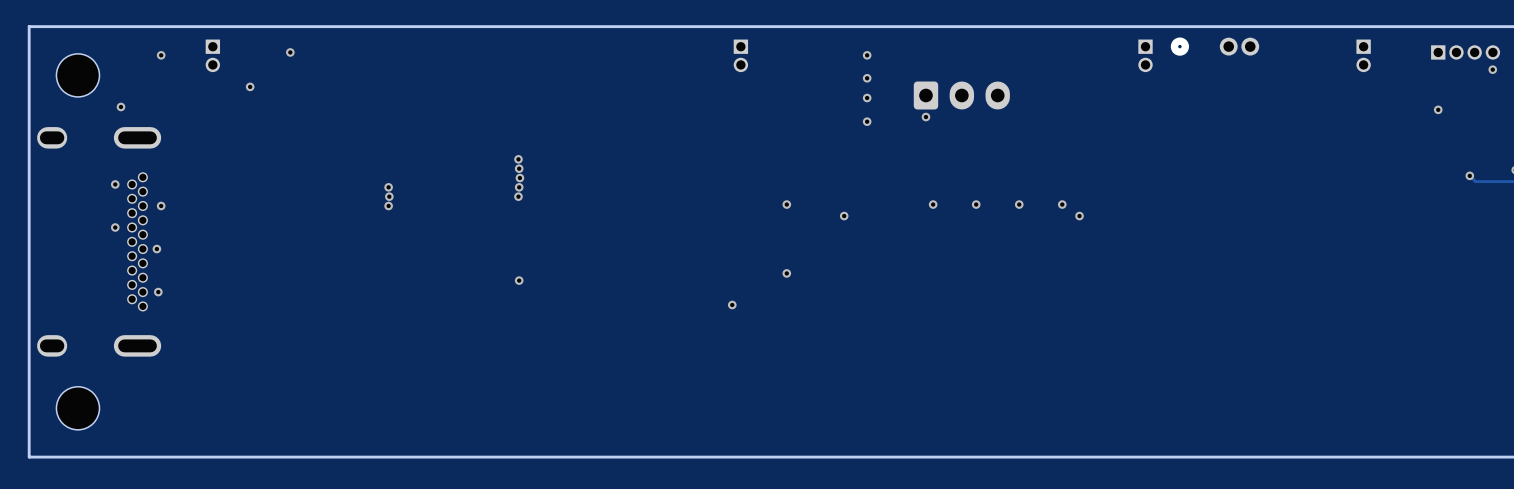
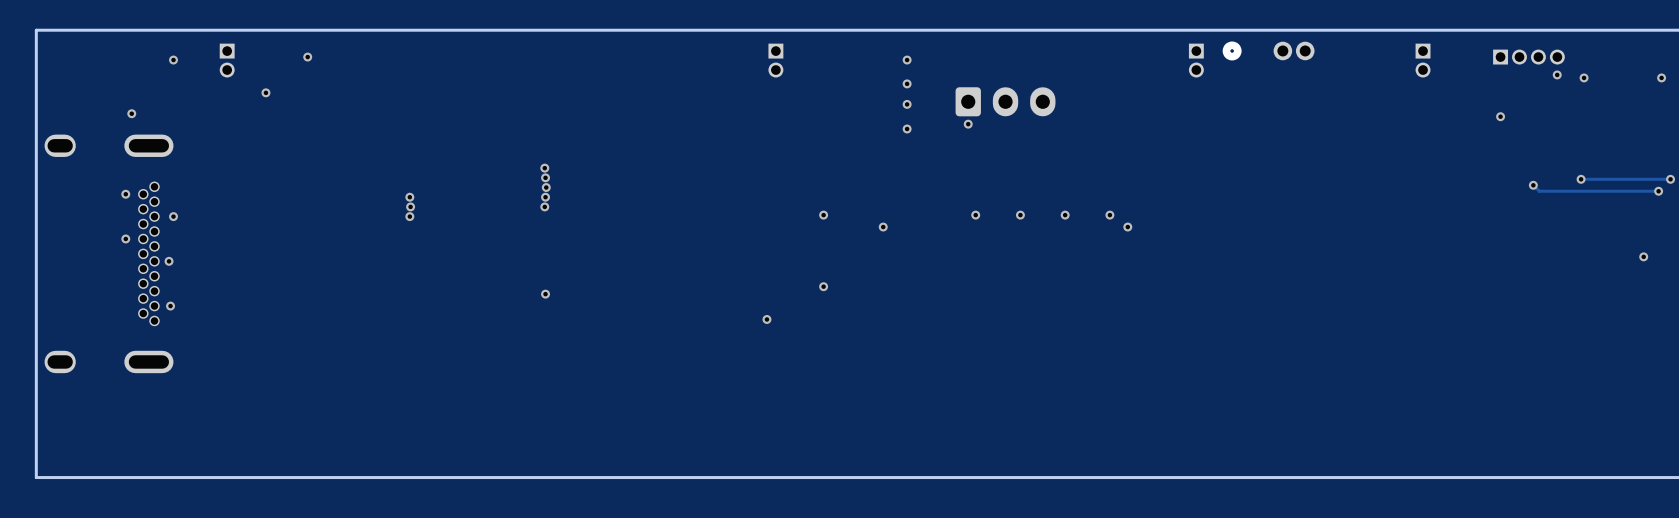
part: (77, 75) -> none
part: (77, 408) -> none

